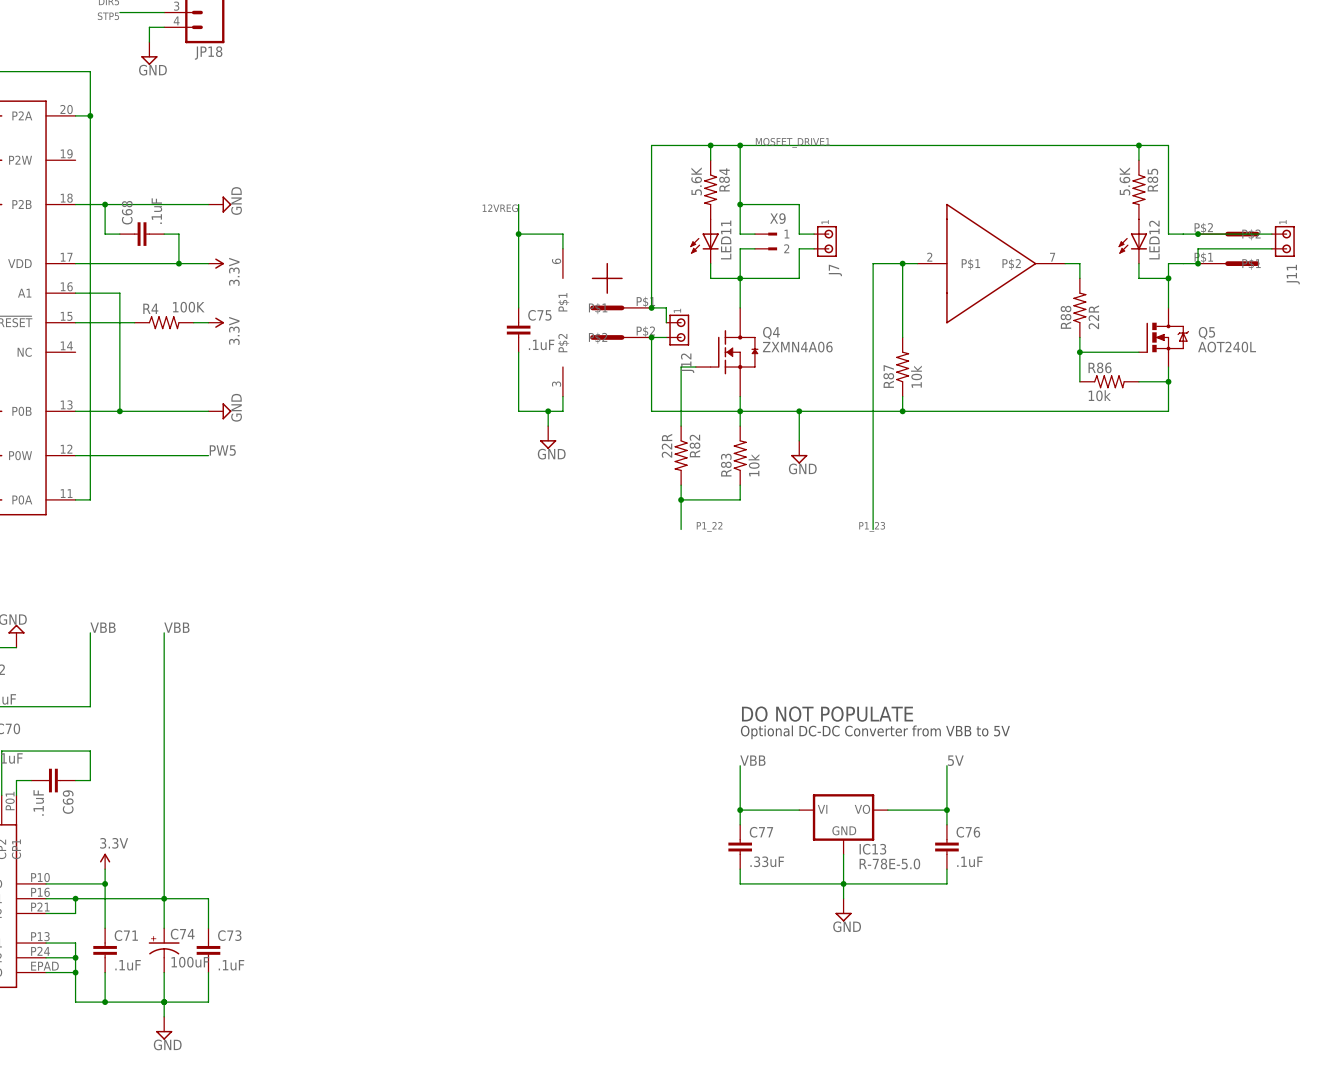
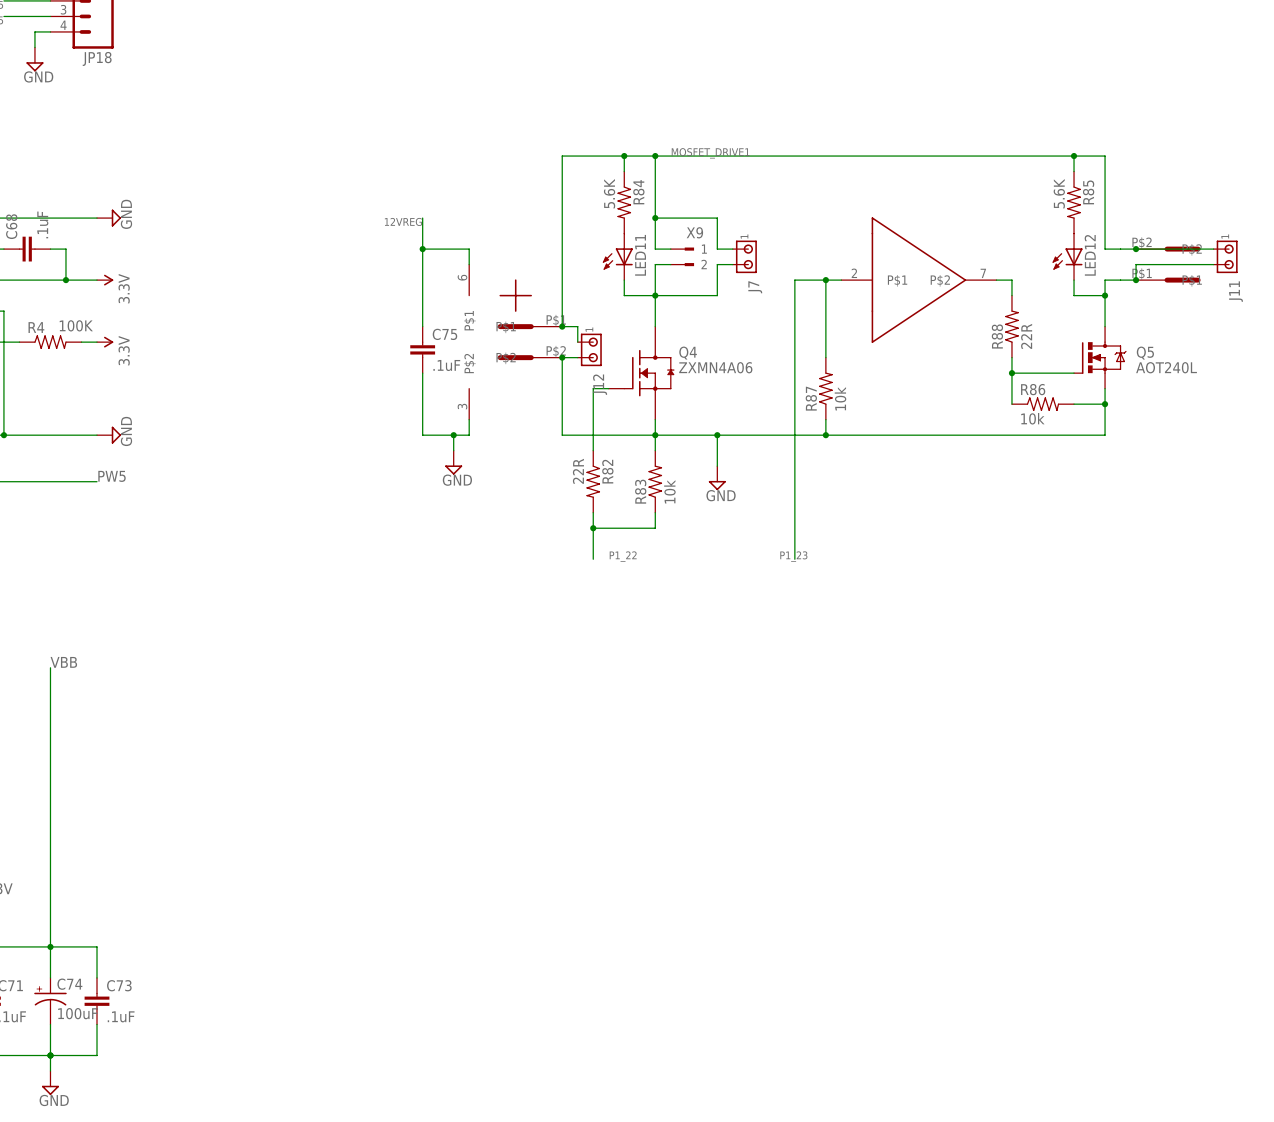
text: DO NOT POPULATE (827, 714) -> none
text: Optional DC-DC Converter from VBB to 5V (875, 732) -> none
label: VBB (752, 760) -> none
label: 5V (955, 760) -> none
wire: (740, 765) (740, 824) -> none
wire: (946, 765) (946, 824) -> none
wire: (740, 810) (799, 810) -> none
junction: (740, 810) -> none
wire: (887, 810) (946, 810) -> none
junction: (946, 810) -> none
IC13: R-78E-5.0 (843, 824) -> none
C77: .33uF (740, 847) -> none
C76: .1uF (946, 847) -> none
wire: (843, 854) (843, 898) -> none
wire: (740, 869) (740, 883) (946, 883) (946, 869) -> none
junction: (843, 883) -> none
power symbol: GND (843, 910) -> none

